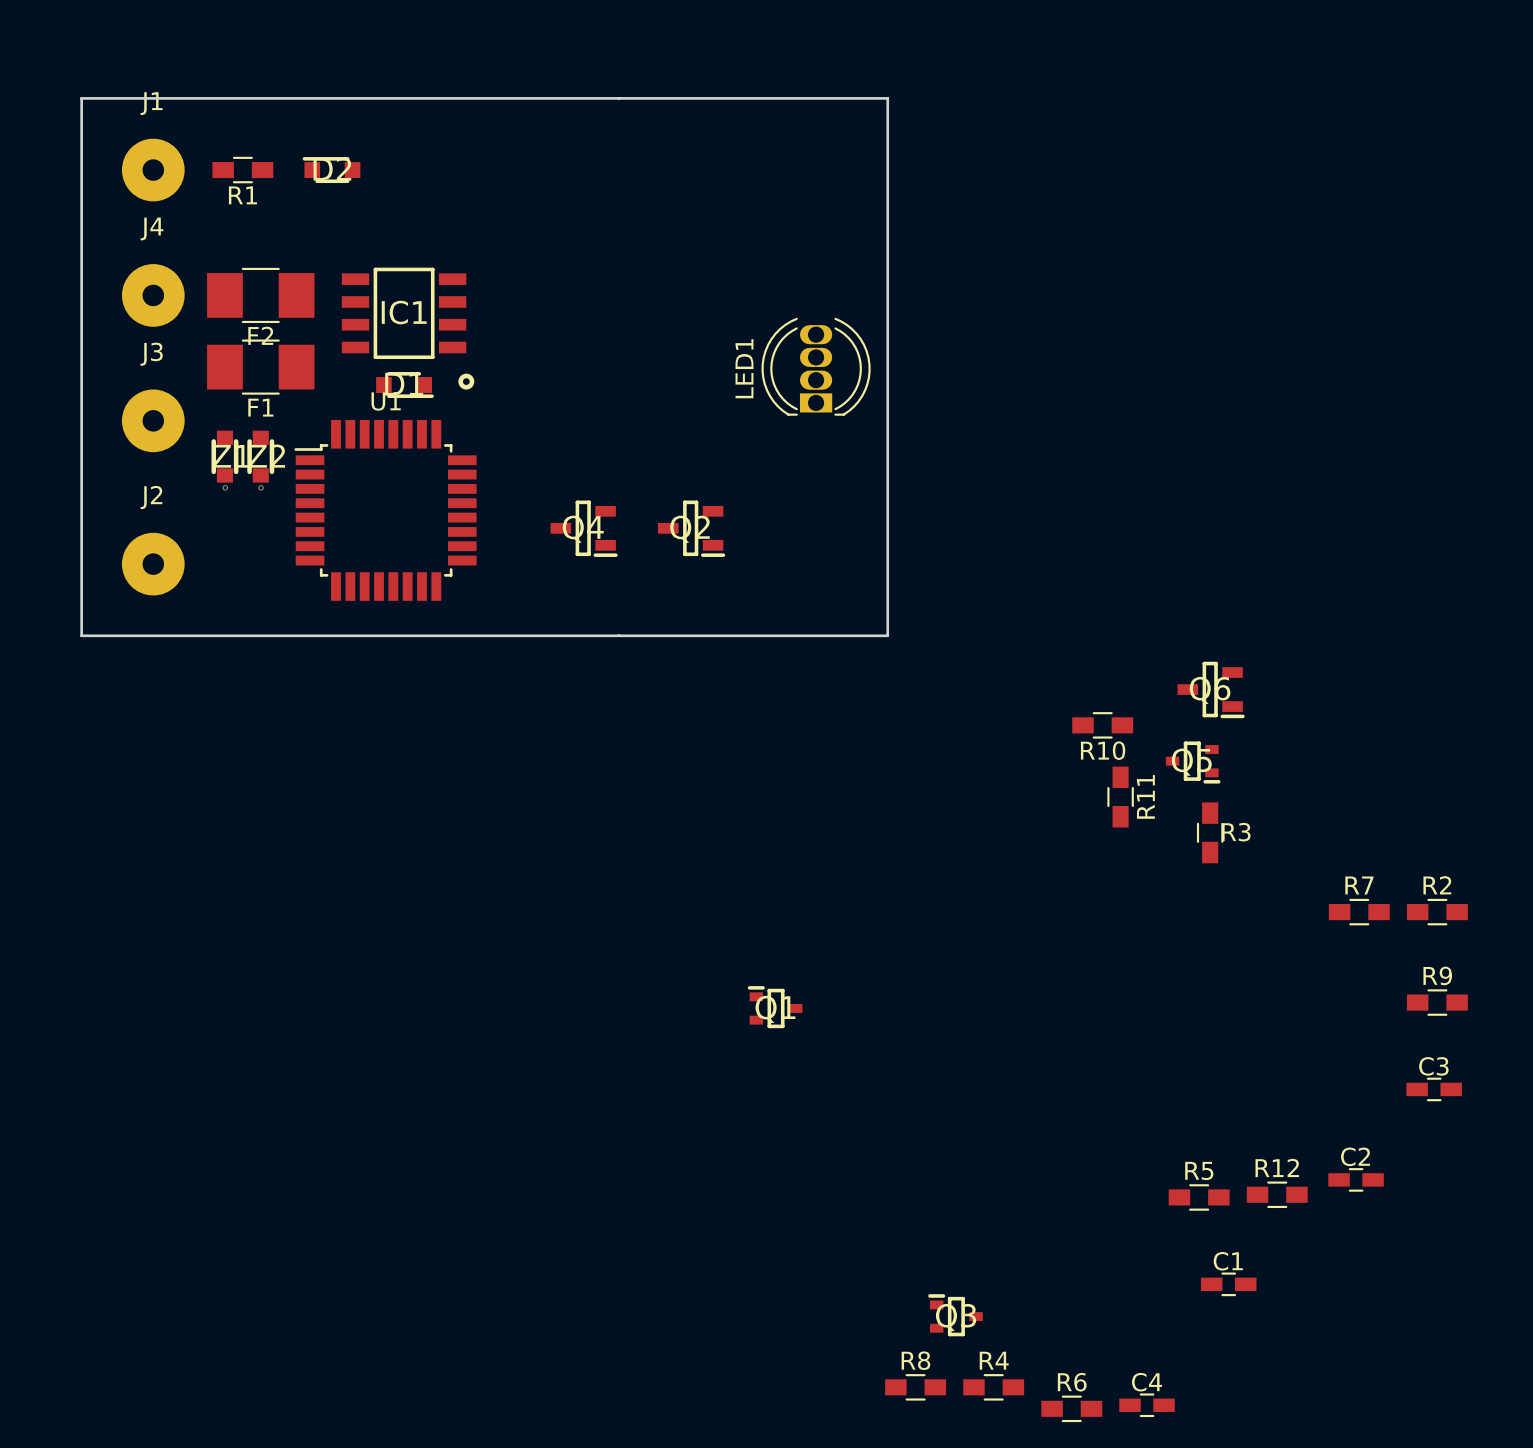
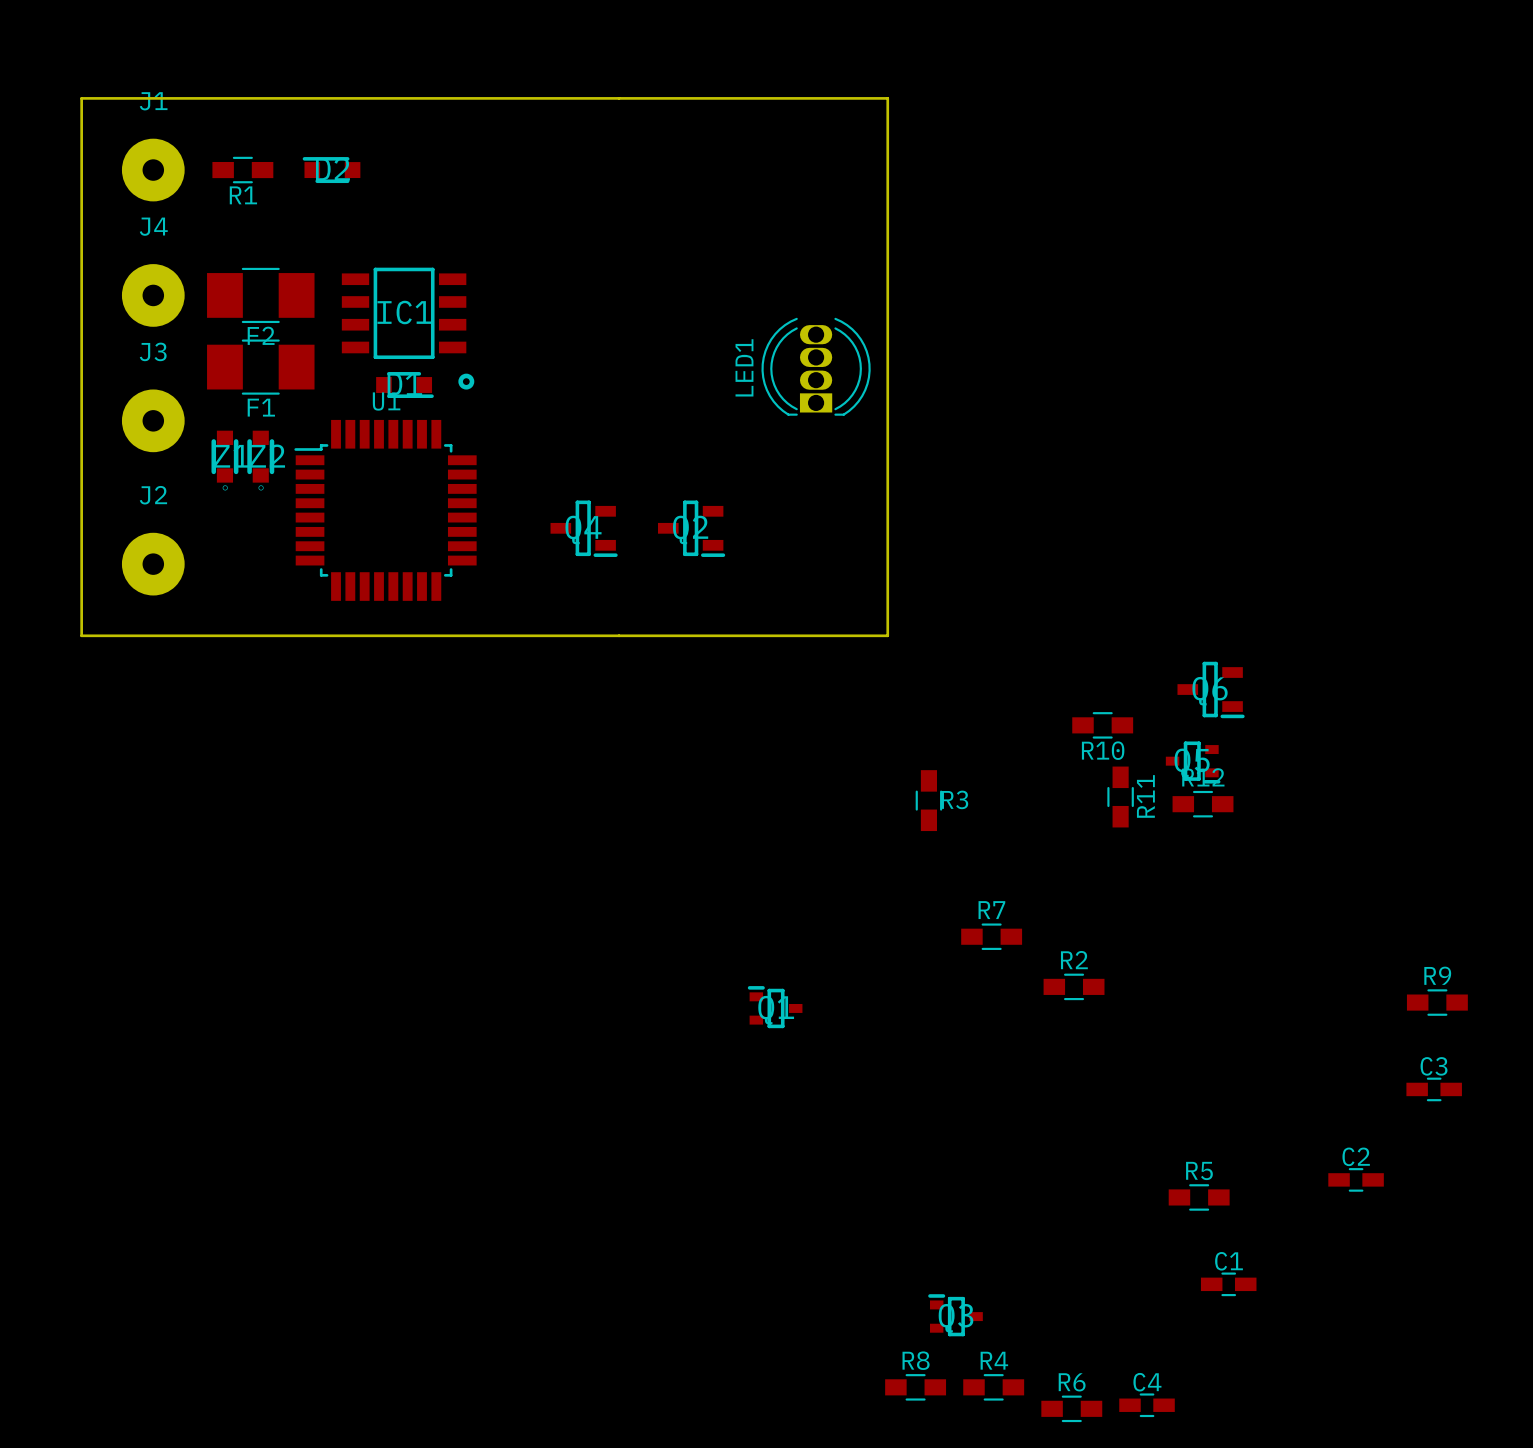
R3 position: (1210, 832) -> (928, 800)
R7 position: (1359, 912) -> (991, 936)
R2 position: (1437, 912) -> (1074, 986)
R12 position: (1277, 1194) -> (1203, 804)

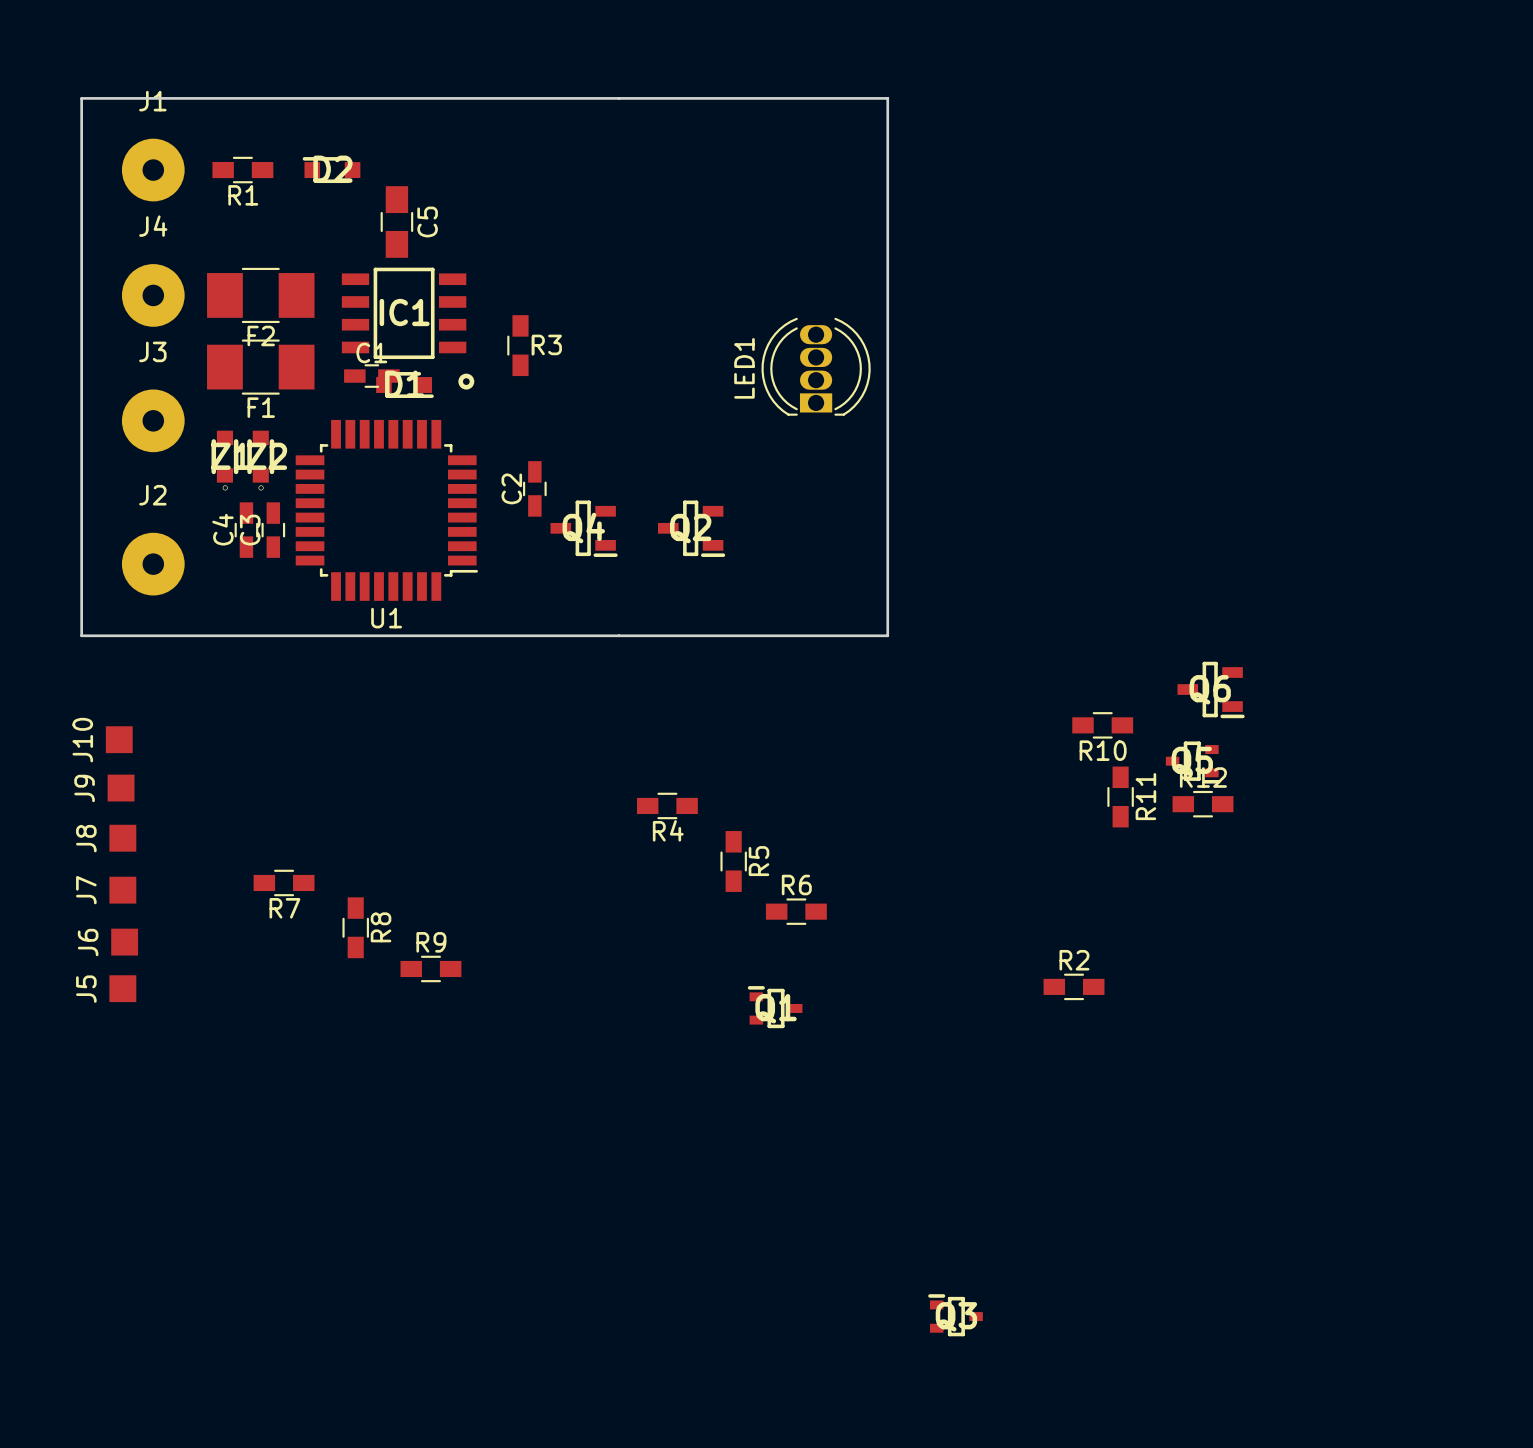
C5: none -> (396, 222)
U1 rotation: 0° (385, 510) -> 180° (386, 510)
J10: none -> (119, 739)
J9: none -> (121, 788)
R3 position: (928, 800) -> (520, 345)
J8: none -> (122, 838)
J7: none -> (122, 890)
R7 name position: R7 (991, 910) -> R7 (284, 908)
R7 position: (991, 936) -> (284, 882)
J6: none -> (124, 942)
J5: none -> (122, 988)
R9 position: (1437, 1002) -> (430, 968)
C3 rotation: 0° (1434, 1089) -> 90° clockwise (273, 530)
C3 position: (1434, 1089) -> (273, 530)
C2 rotation: 0° (1356, 1179) -> 90° clockwise (534, 488)
C2 position: (1356, 1179) -> (534, 488)
R5 rotation: 0° (1199, 1197) -> 90° clockwise (733, 861)
R5 position: (1199, 1197) -> (733, 861)
C1 position: (1228, 1284) -> (371, 376)
R4 name position: R4 (994, 1360) -> R4 (668, 830)
R8 rotation: 0° (915, 1387) -> 90° clockwise (355, 927)
R8 position: (915, 1387) -> (355, 927)
R4 position: (993, 1387) -> (667, 805)
C4 rotation: 0° (1147, 1405) -> 90° clockwise (246, 530)
C4 position: (1147, 1405) -> (246, 530)
R6 position: (1071, 1408) -> (796, 911)

